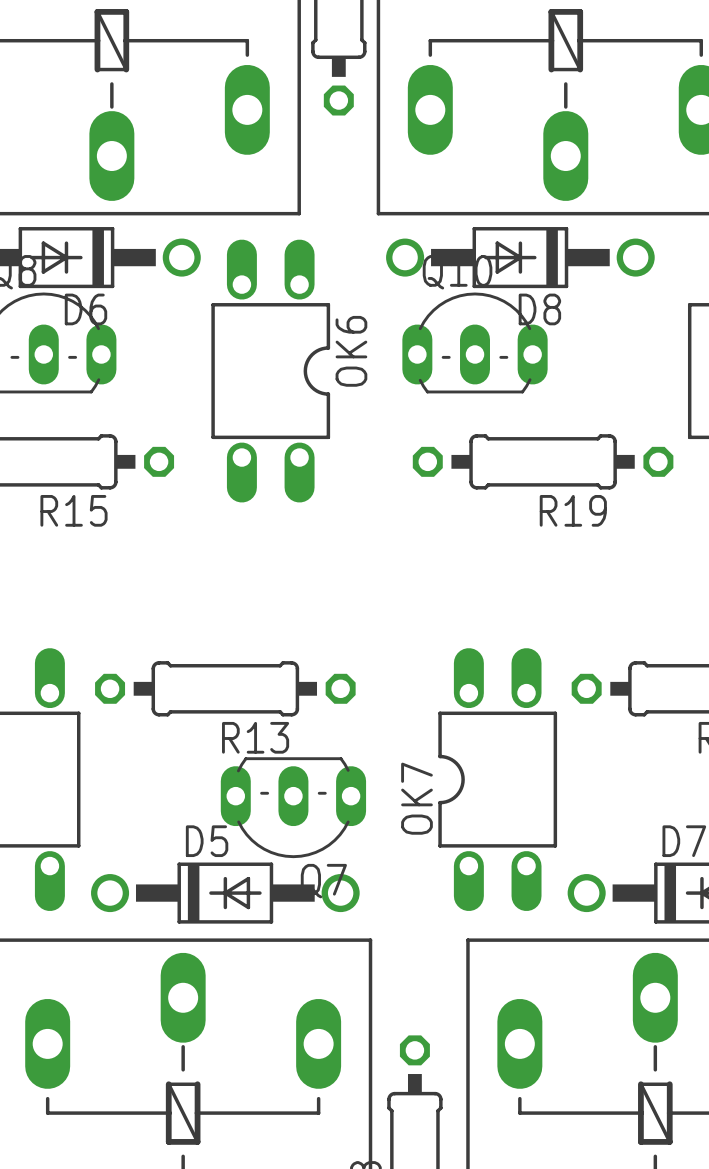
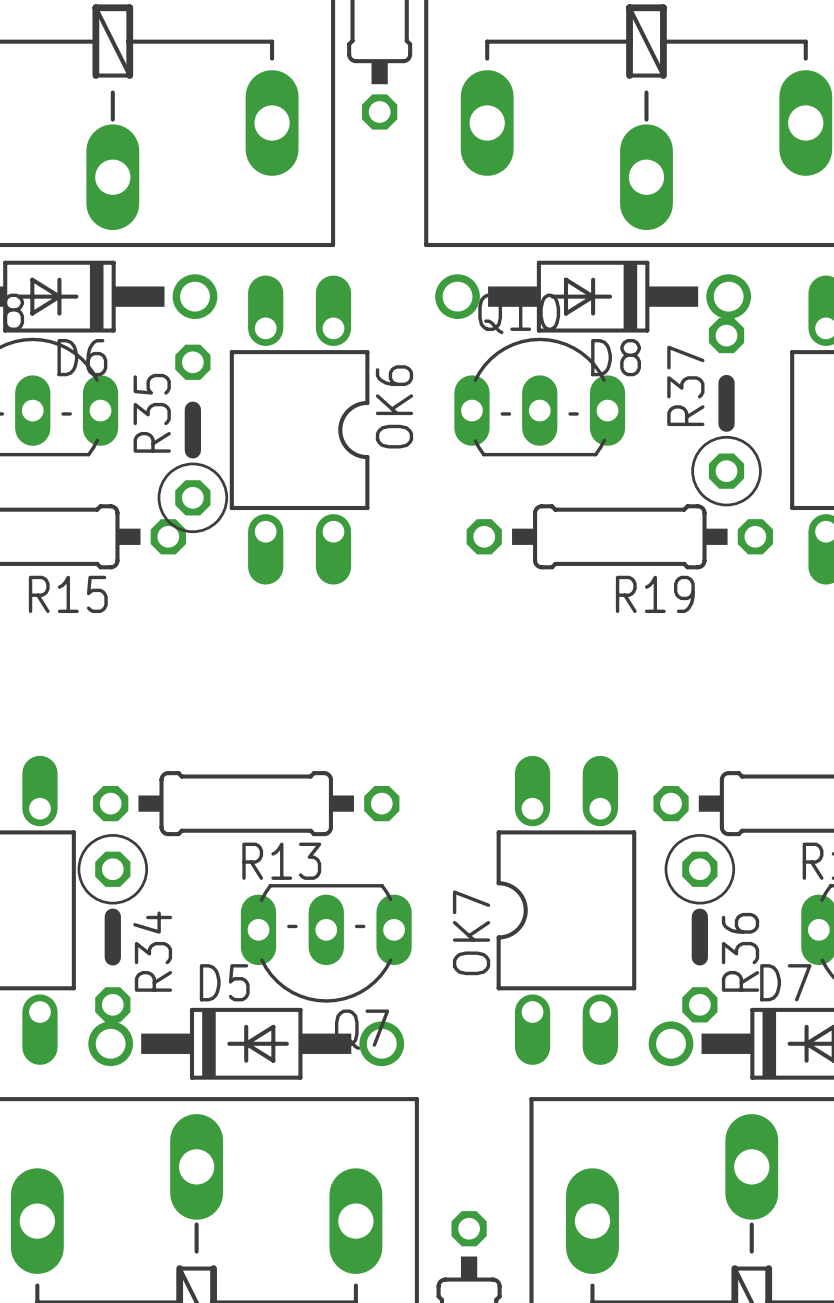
R37: none -> (726, 412)
R35: none -> (192, 438)
R34: none -> (112, 928)
R36: none -> (699, 928)

